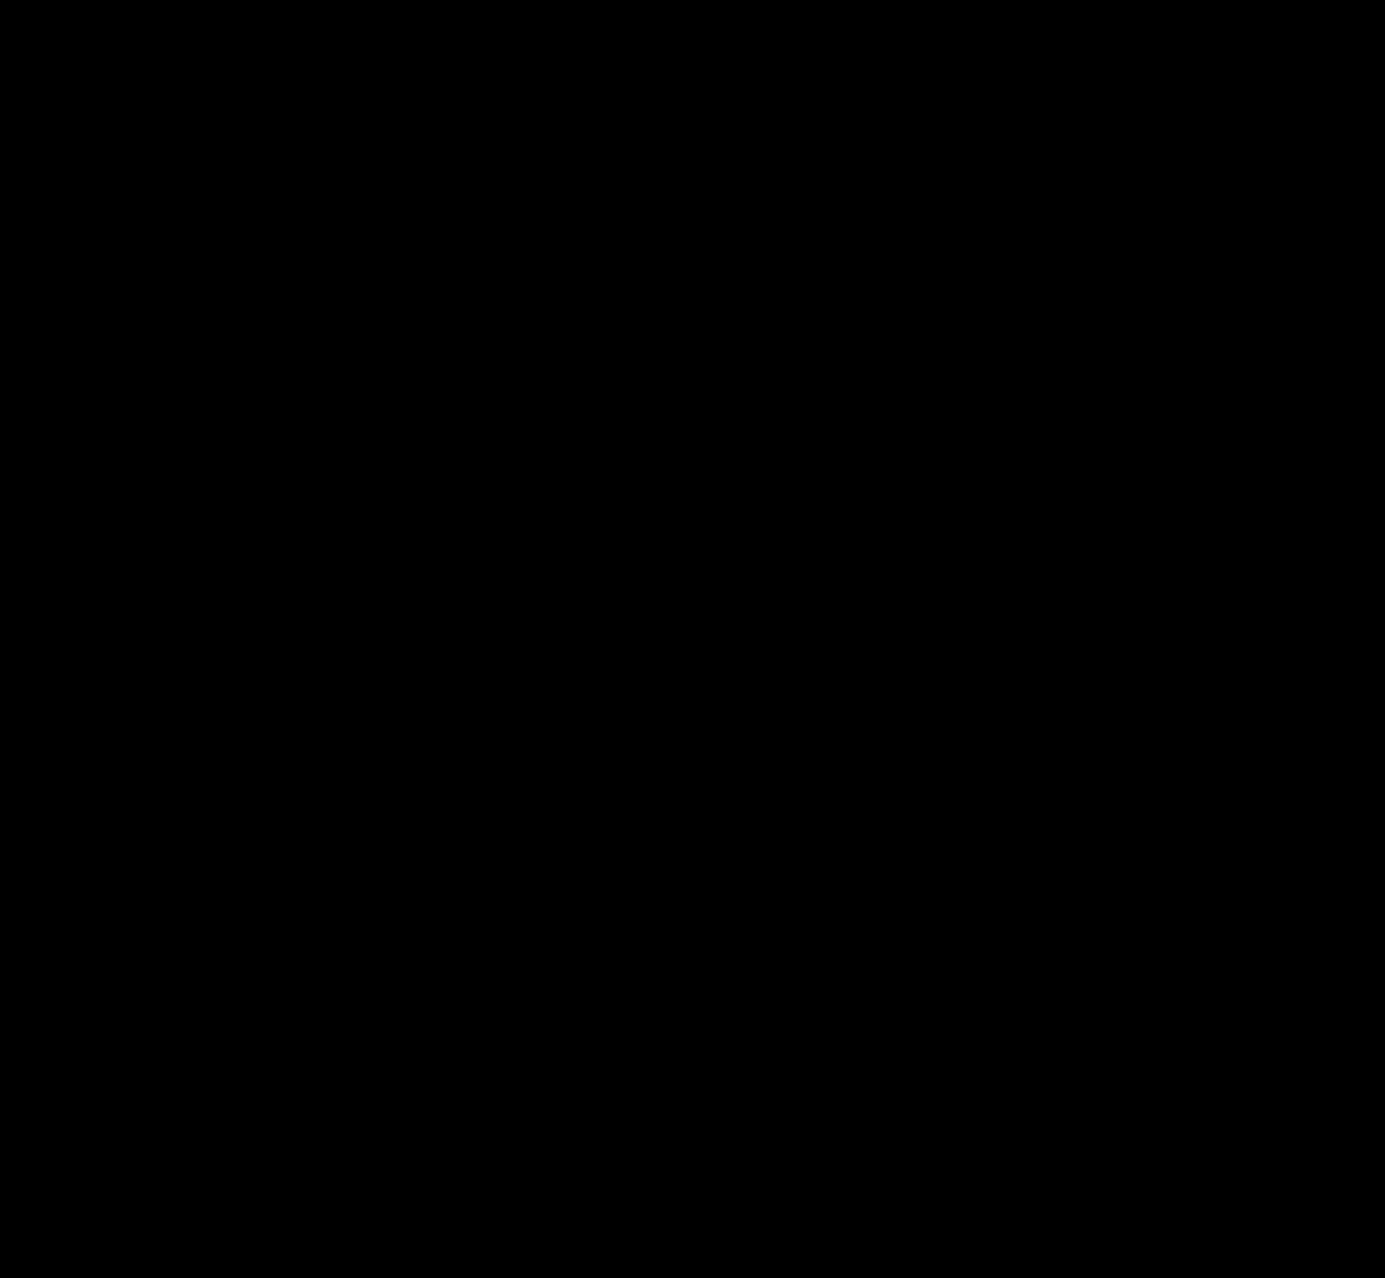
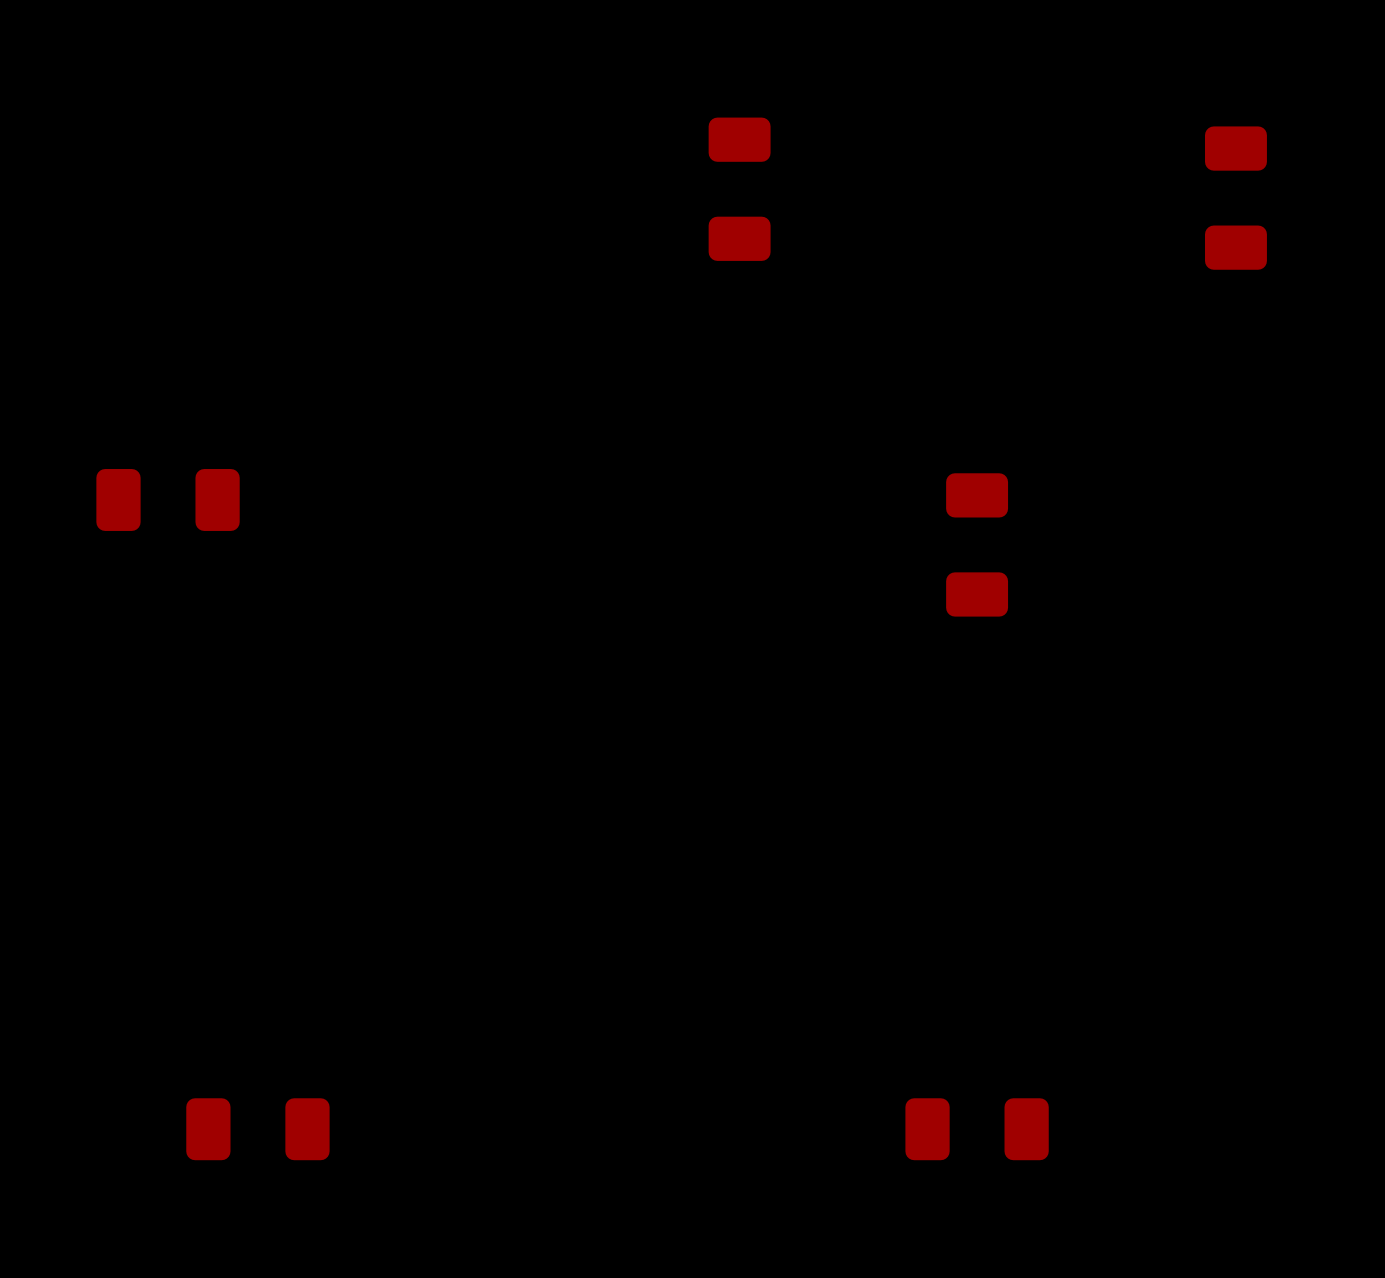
part: none -> (739, 189)
part: none -> (1235, 198)
part: none -> (168, 499)
part: none -> (977, 544)
part: none -> (257, 1129)
part: none -> (977, 1129)

